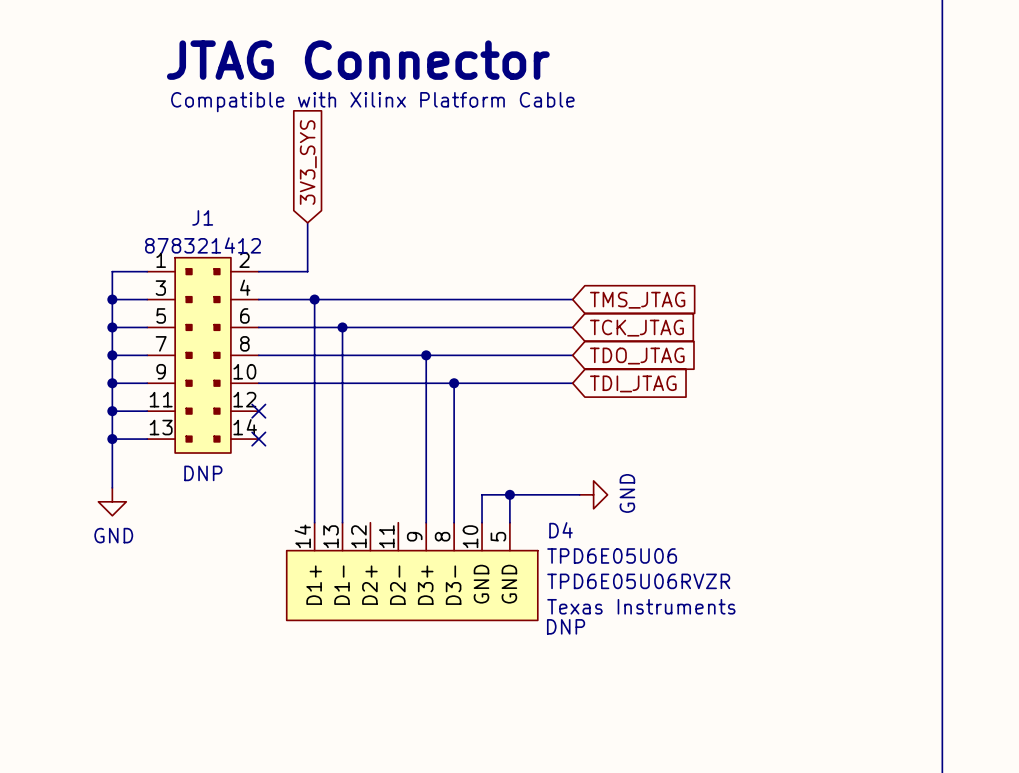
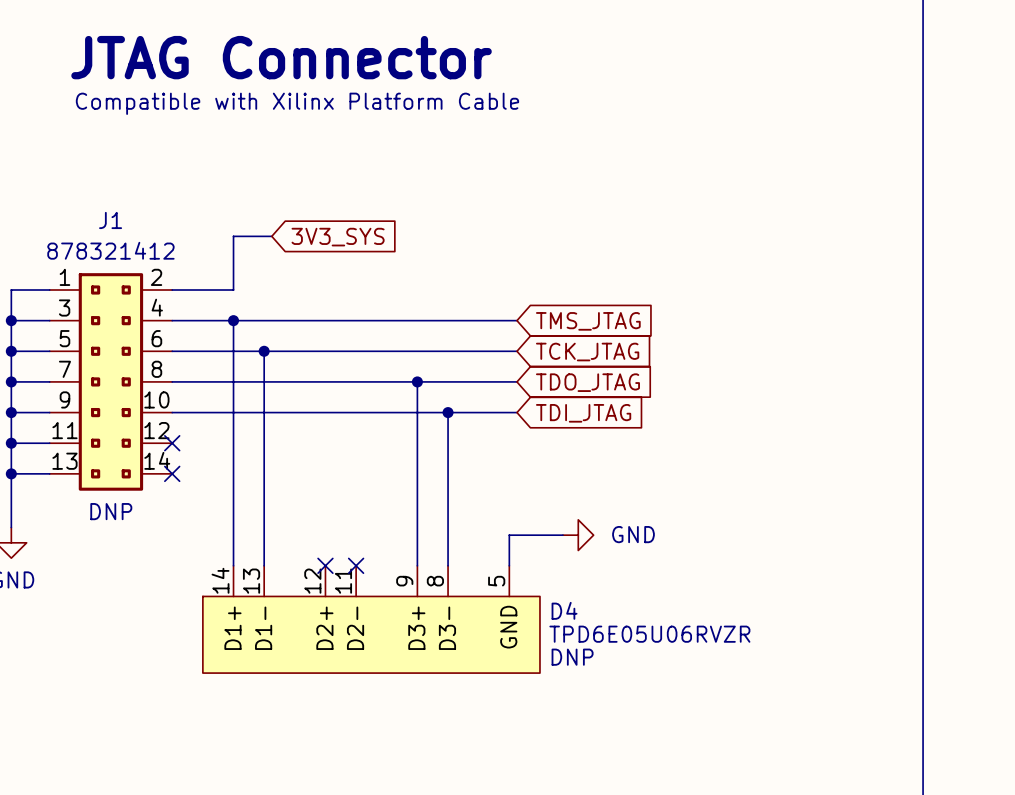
global label rotation: 0° (308, 162) -> 90° clockwise (338, 237)
wire: (307, 222) (307, 271) -> (271, 236) (233, 236) (233, 290) (225, 290)
J1 text: none -> 878321412 (110, 250)
J1 value: 878321412 (203, 245) -> none
J1 symbol: [147, 257, 259, 454] -> [49, 273, 173, 491]
wire: (426, 355) (426, 522) -> none
junction: (426, 355) -> none
junction: none -> (417, 381)
wire: (454, 383) (454, 522) -> (417, 381) (417, 535)
junction: (454, 383) -> none
wire: none -> (448, 412) (448, 535)
junction: none -> (448, 412)
power symbol text rotation: 0° (627, 493) -> 90° clockwise (633, 534)
wire: (482, 494) (565, 494) -> (509, 565) (509, 535)
junction: (509, 494) -> none
wire: none -> (524, 535) (562, 535)
power symbol position: GND (593, 494) -> GND (578, 535)
D4 symbol: [286, 522, 538, 621] -> [202, 565, 540, 674]
no-connect mark: none -> (325, 565)
no-connect mark: none -> (356, 565)
D4 name position: D4 (561, 530) -> D4 (564, 610)
D4 value: TPD6E05U06 (612, 555) -> TPD6E05U06RVZR (649, 634)
D4 text: TPD6E05U06RVZR (638, 581) -> none
D4 text: Texas Instruments (641, 606) -> none
D4 text position: DNP (566, 626) -> DNP (572, 657)

